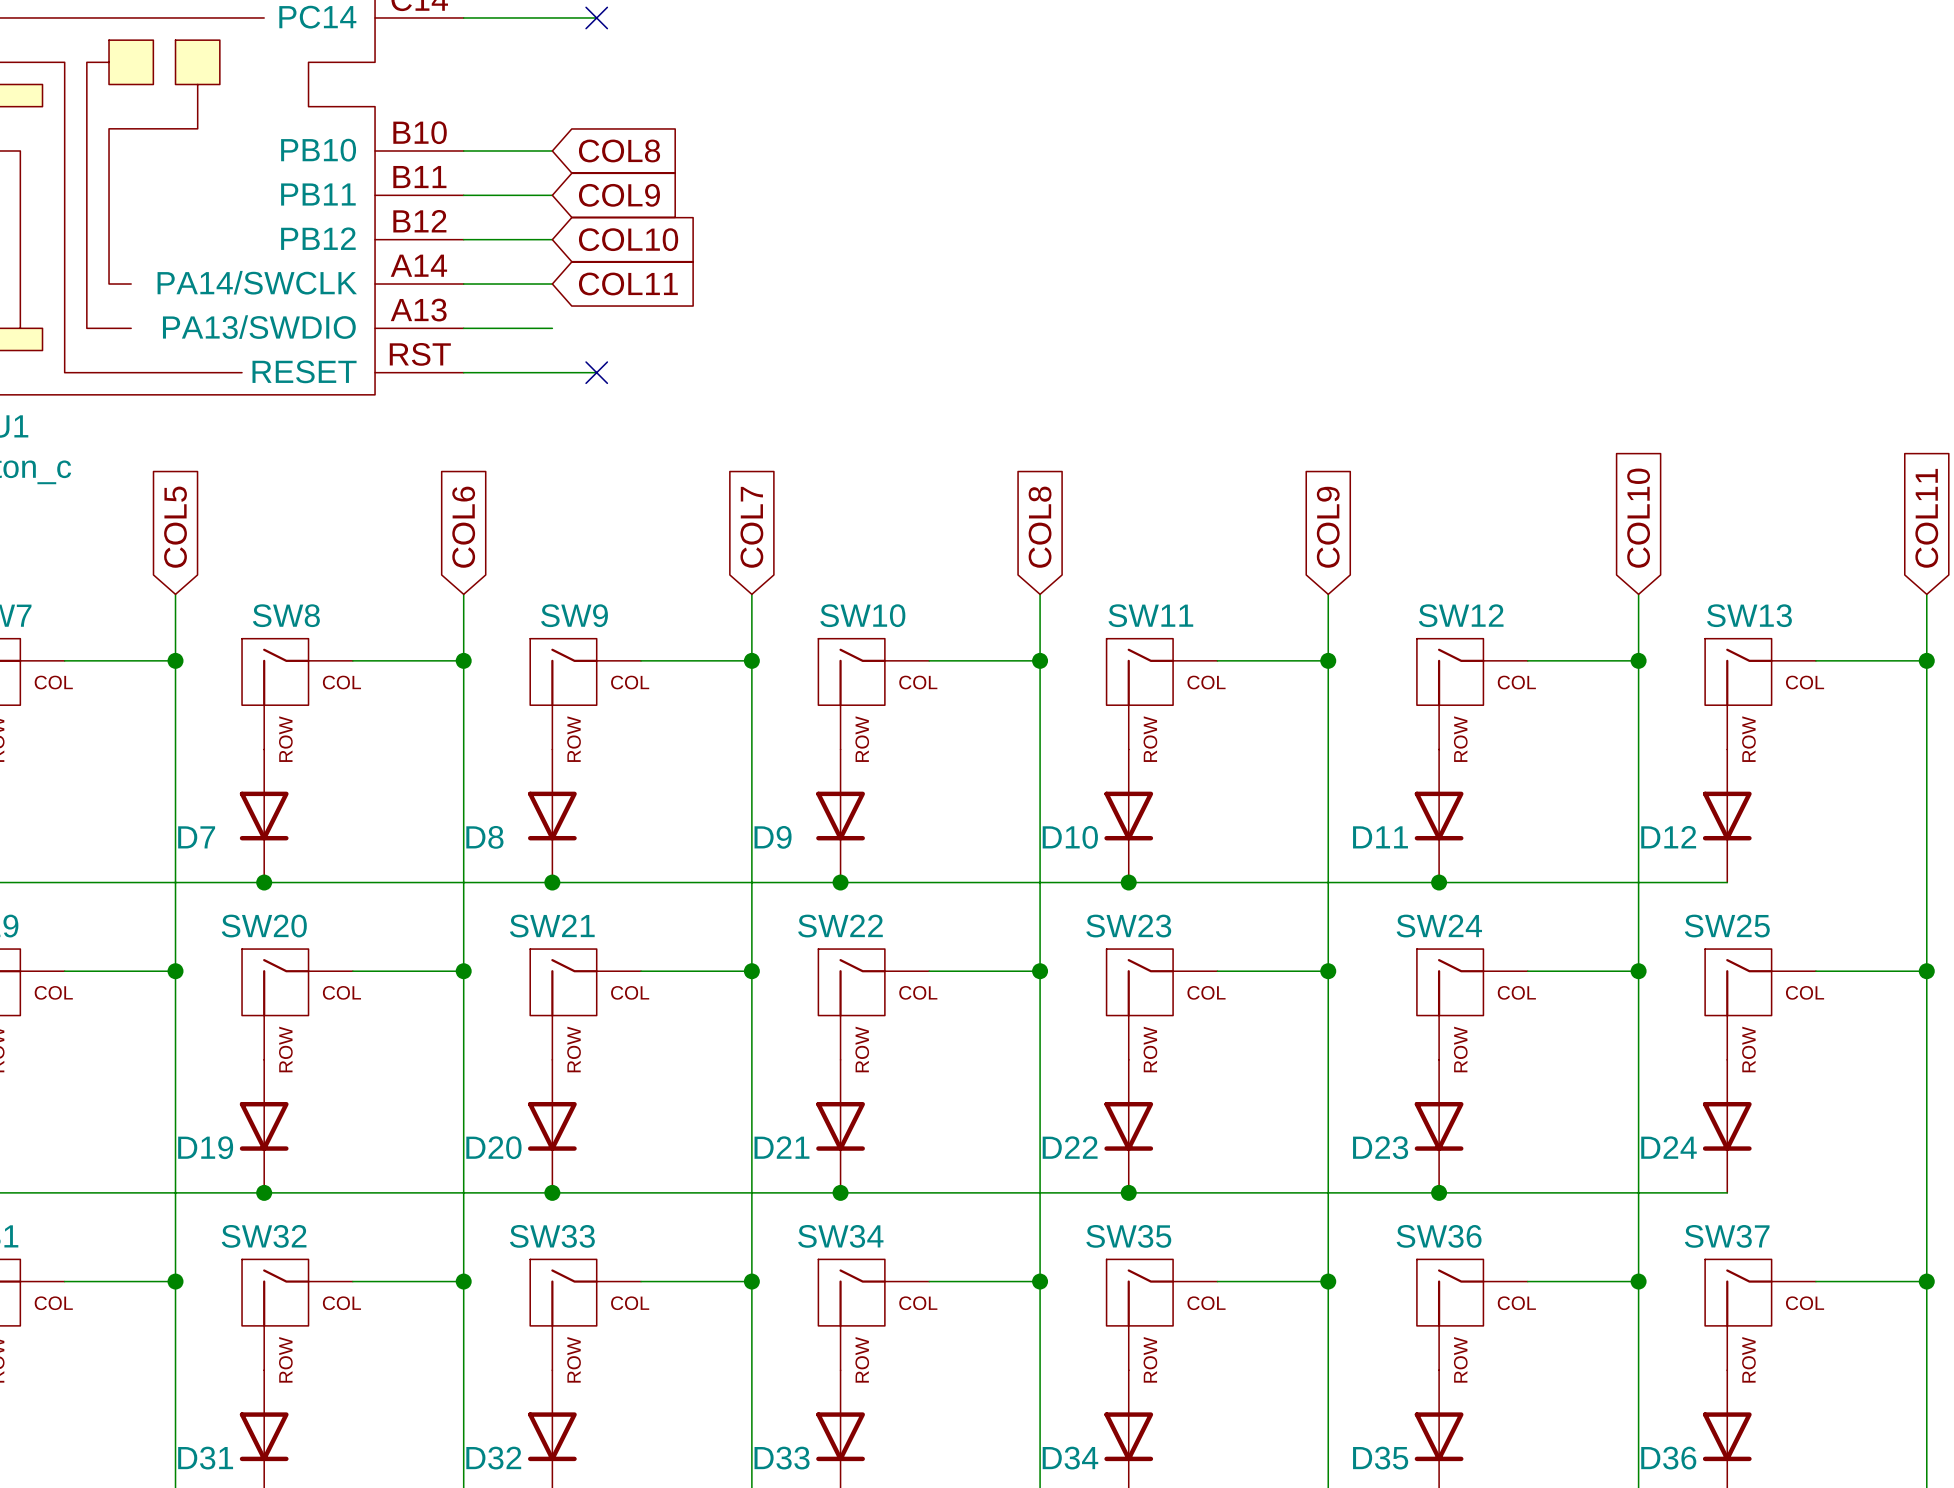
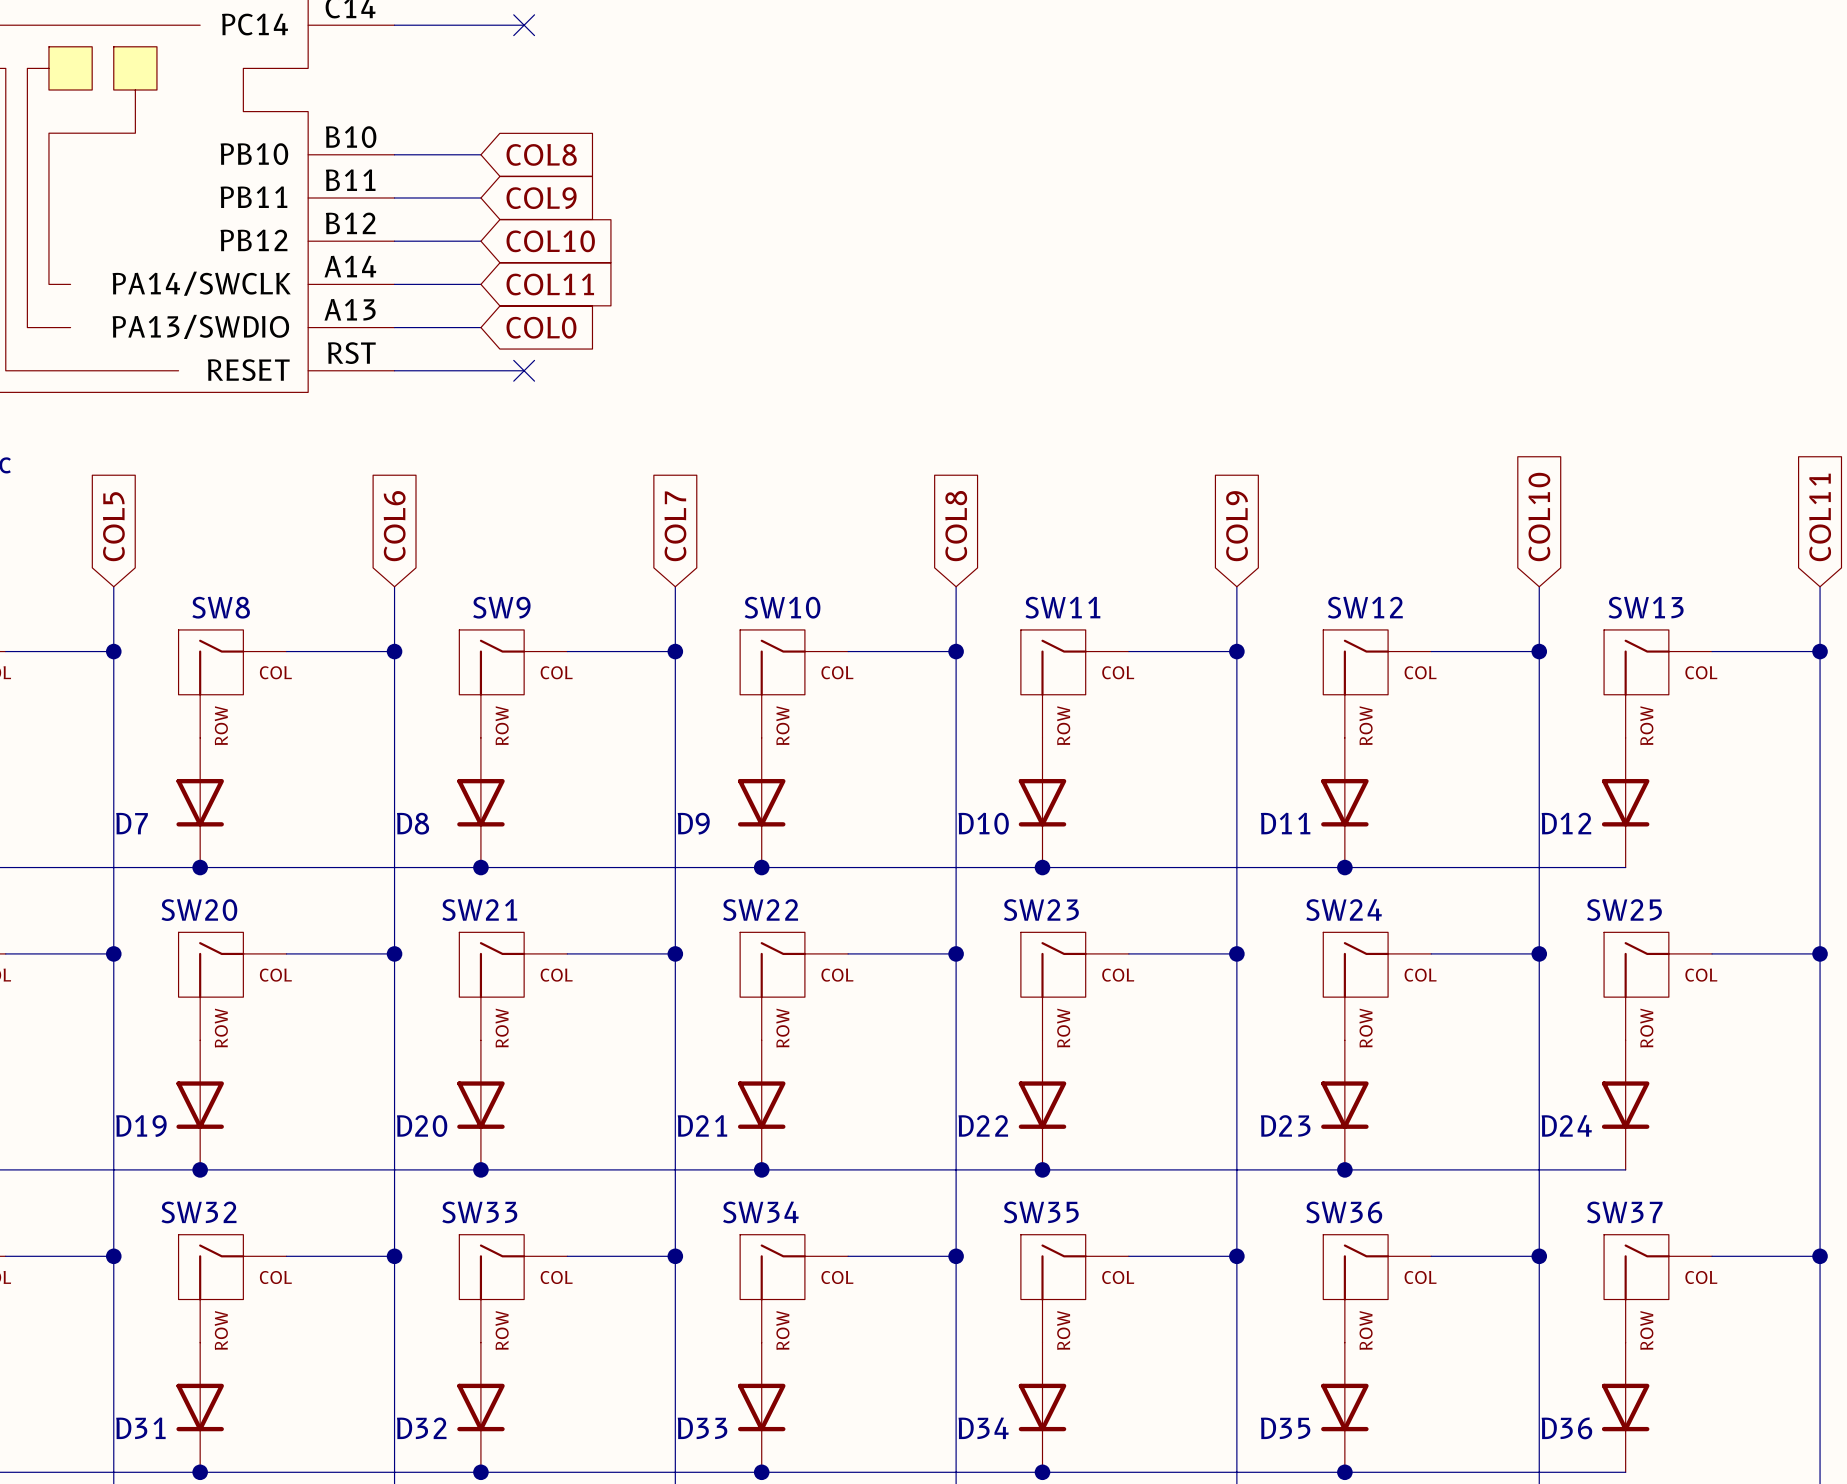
global label: none -> COL0 (541, 327)

